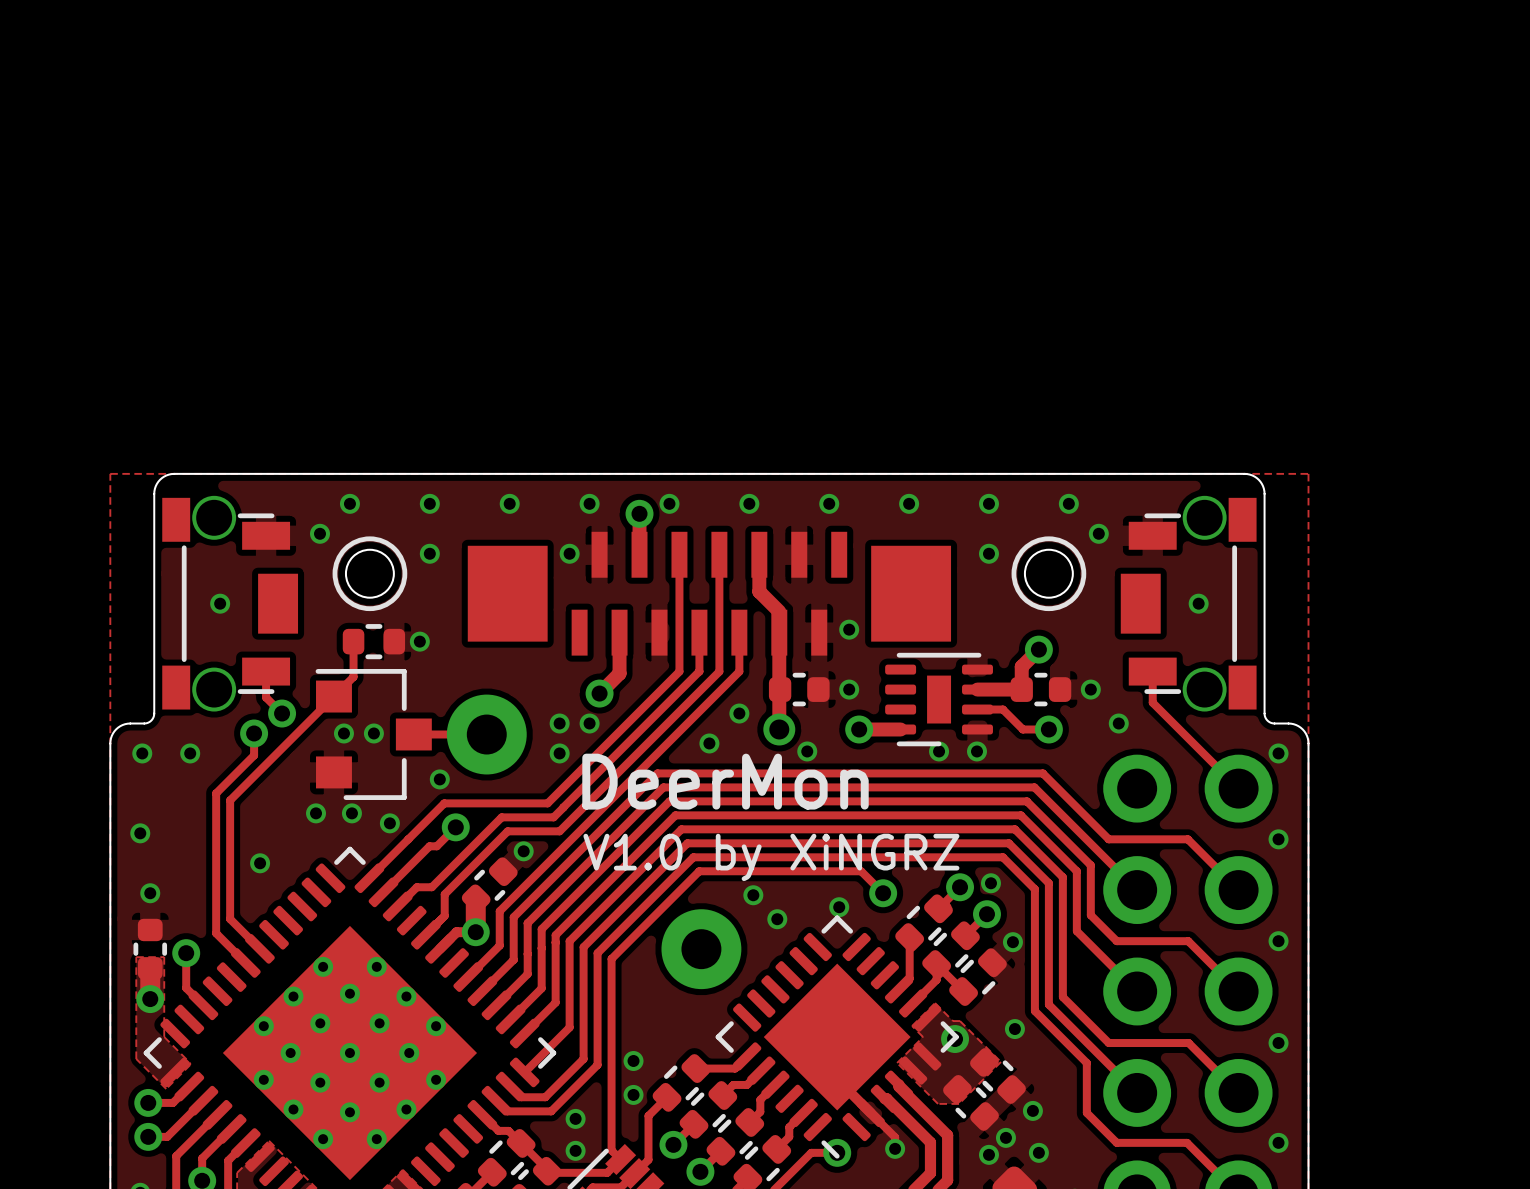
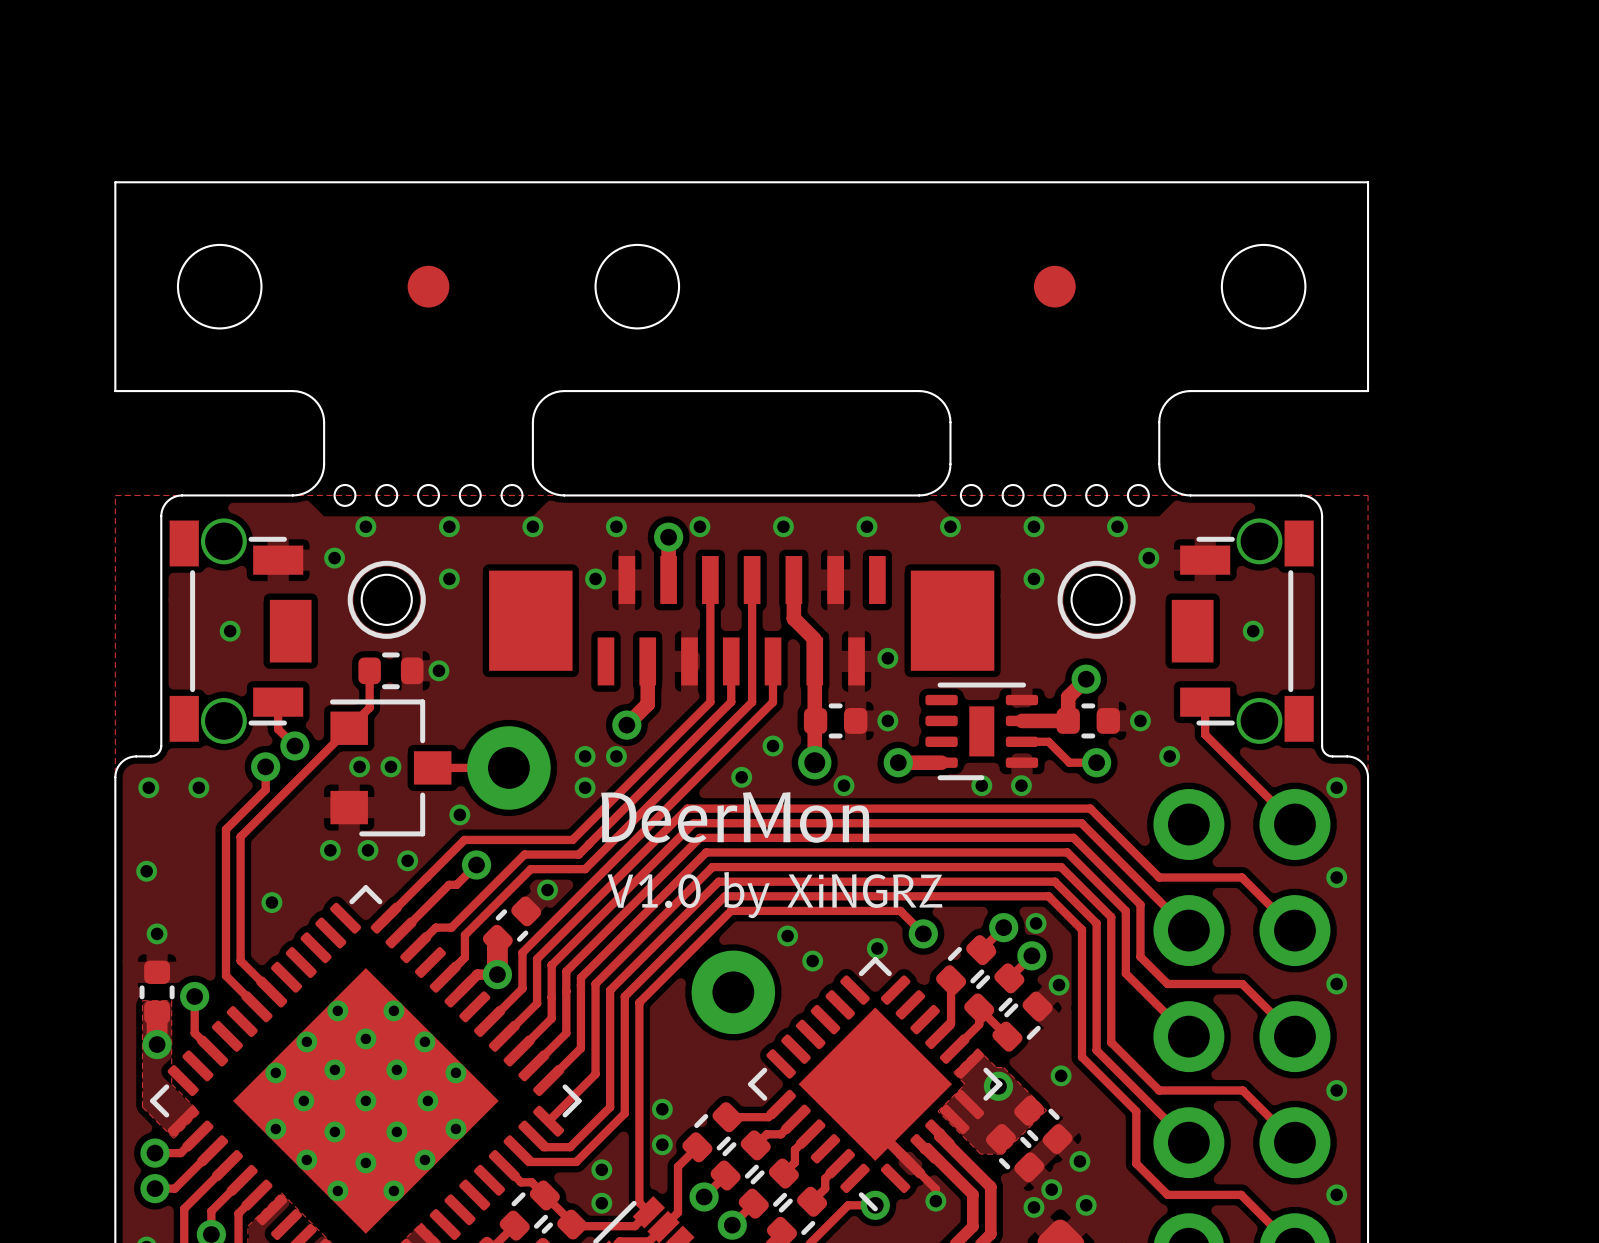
round board edge: none -> [176, 243, 263, 330]
round board edge: none -> [594, 243, 681, 330]
round board edge: none -> [1220, 243, 1307, 330]
part: none -> (428, 286)
part: none -> (1054, 286)
round board edge: none -> [333, 483, 357, 507]
round board edge: none -> [375, 483, 399, 507]
round board edge: none -> [417, 483, 441, 507]
round board edge: none -> [458, 483, 482, 507]
round board edge: none -> [500, 483, 524, 507]
round board edge: none -> [959, 483, 983, 507]
round board edge: none -> [1001, 483, 1025, 507]
round board edge: none -> [1043, 483, 1067, 507]
round board edge: none -> [1085, 483, 1109, 507]
round board edge: none -> [1126, 483, 1150, 507]
board edge: (280, 473) (539, 473) -> (292, 495) (304, 493) (311, 488) (319, 479) (323, 468) (323, 414) (317, 403) (308, 395) (292, 391) (115, 391) (115, 182) (1368, 182) (1368, 391) (1190, 391) (1174, 395) (1165, 403) (1160, 414) (1159, 468) (1163, 479) (1171, 488) (1178, 493) (1190, 495)
board edge: (879, 473) (1138, 473) -> (919, 495) (931, 493) (941, 486) (948, 476) (950, 464) (950, 422) (948, 410) (938, 397) (931, 393) (919, 391) (556, 392) (542, 400) (533, 414) (533, 468) (537, 479) (545, 488) (552, 493) (564, 495)

